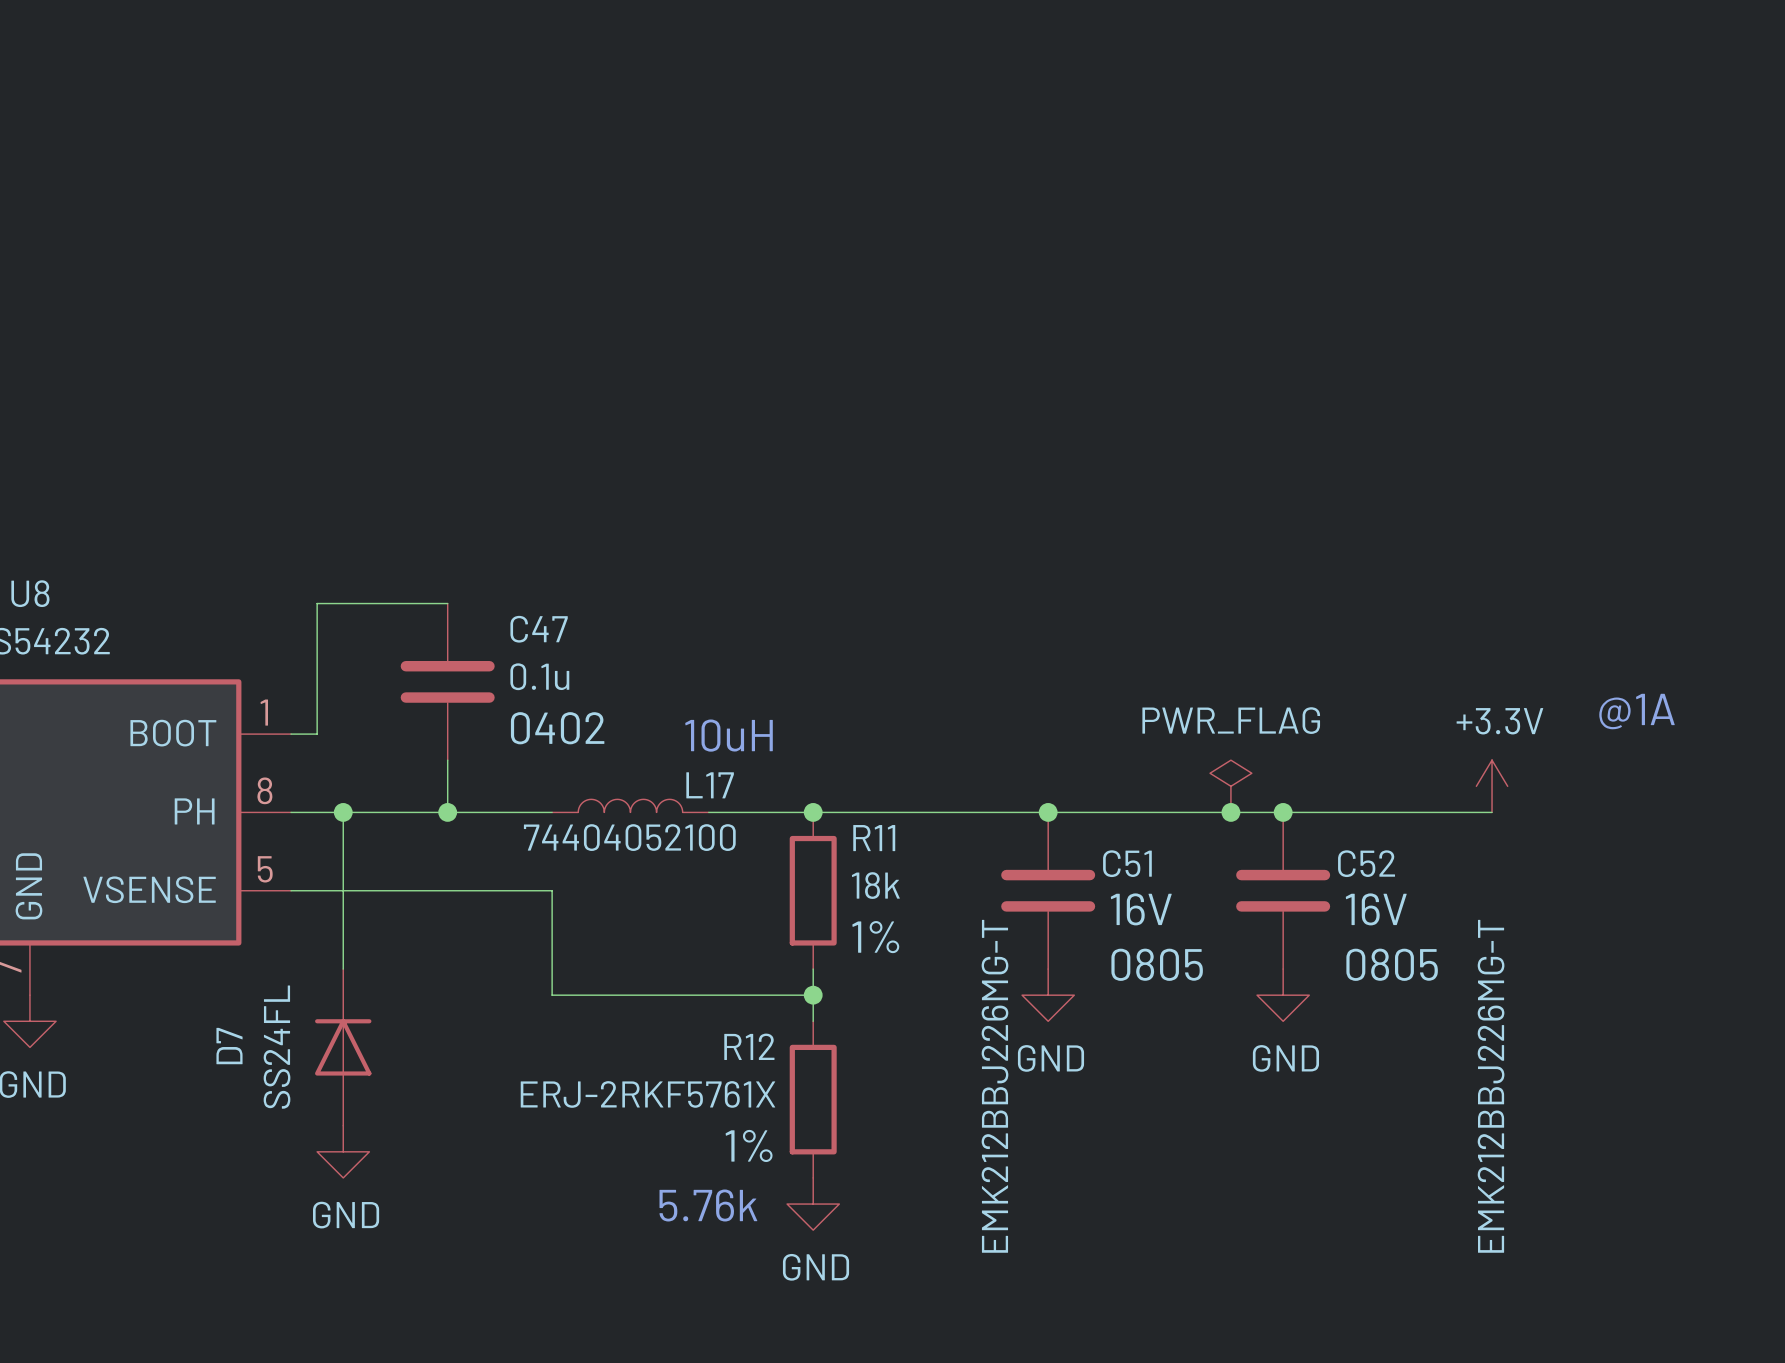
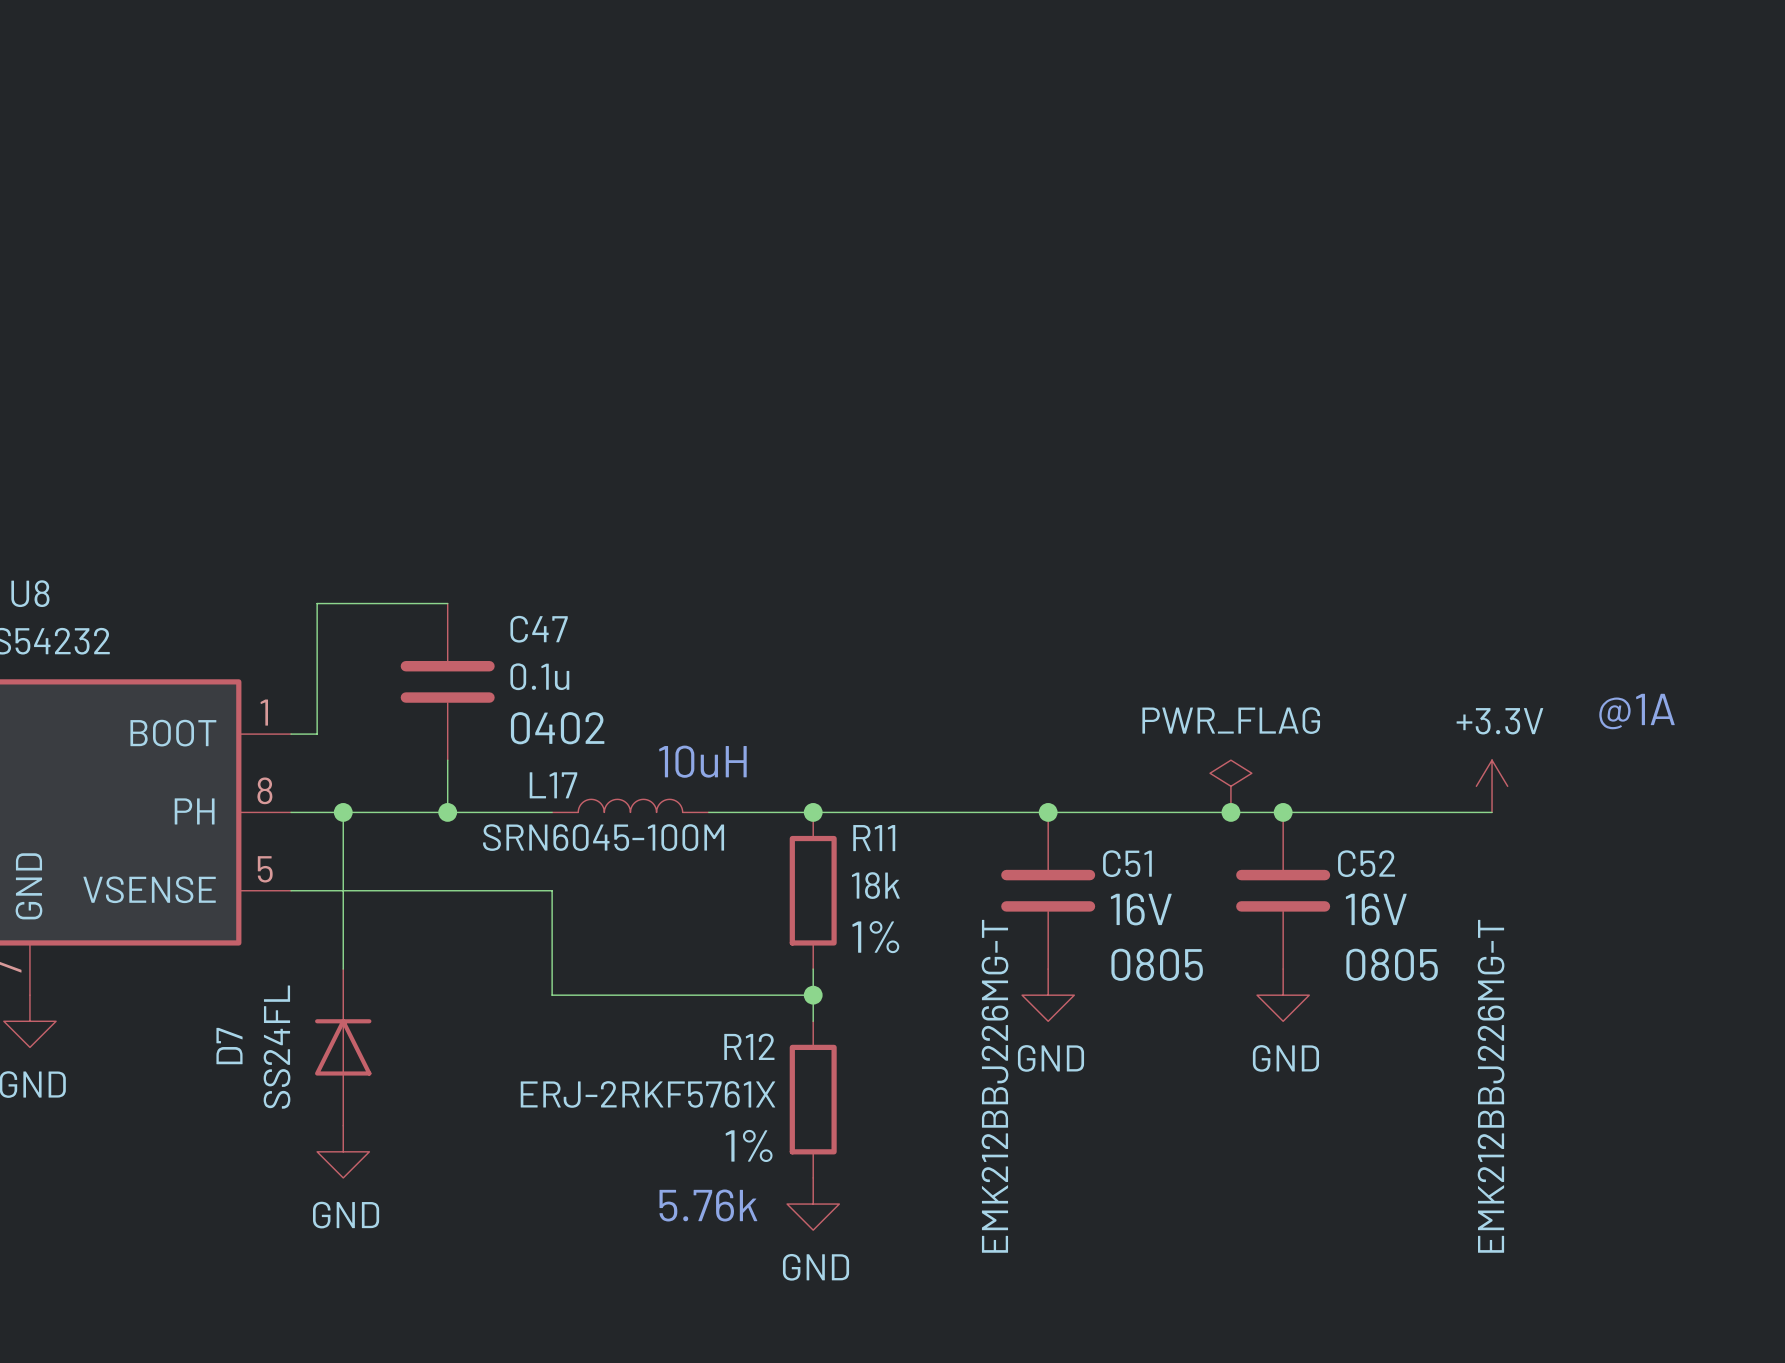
text position: 10uH (729, 735) -> 10uH (702, 761)
L17 name position: L17 (710, 785) -> L17 (553, 785)
L17 value: 74404052100 (629, 837) -> SRN6045-100M (603, 837)

